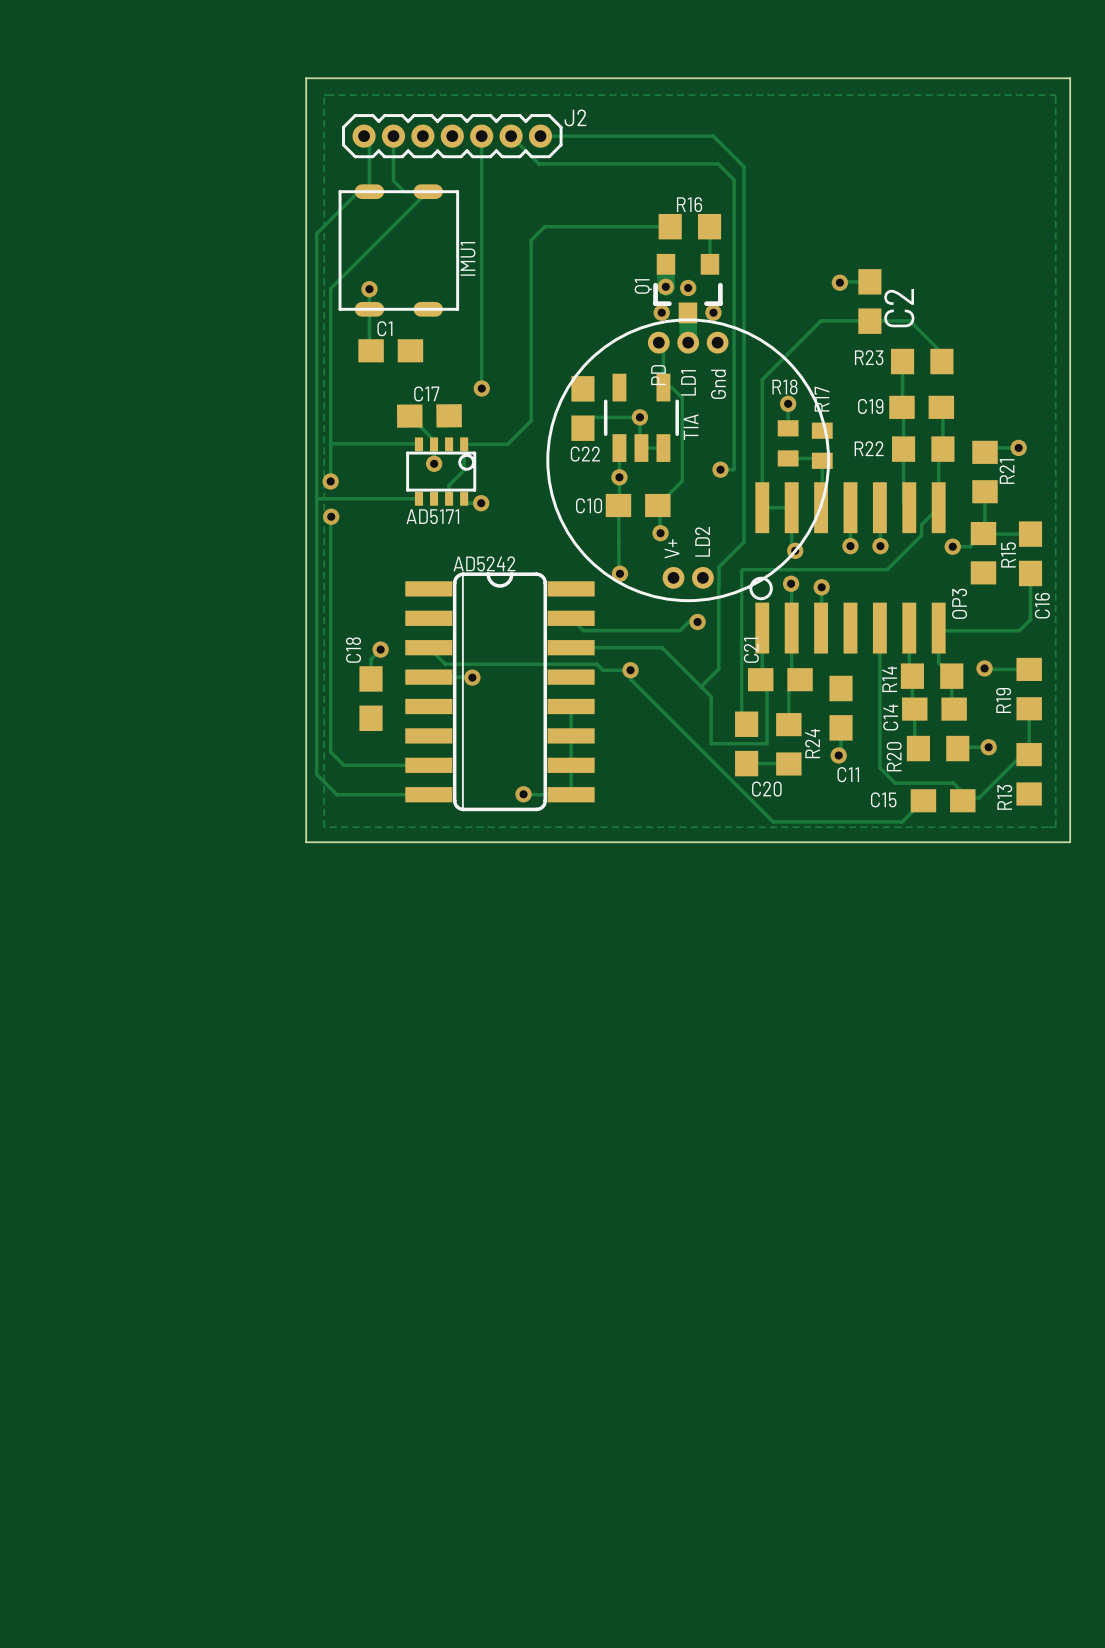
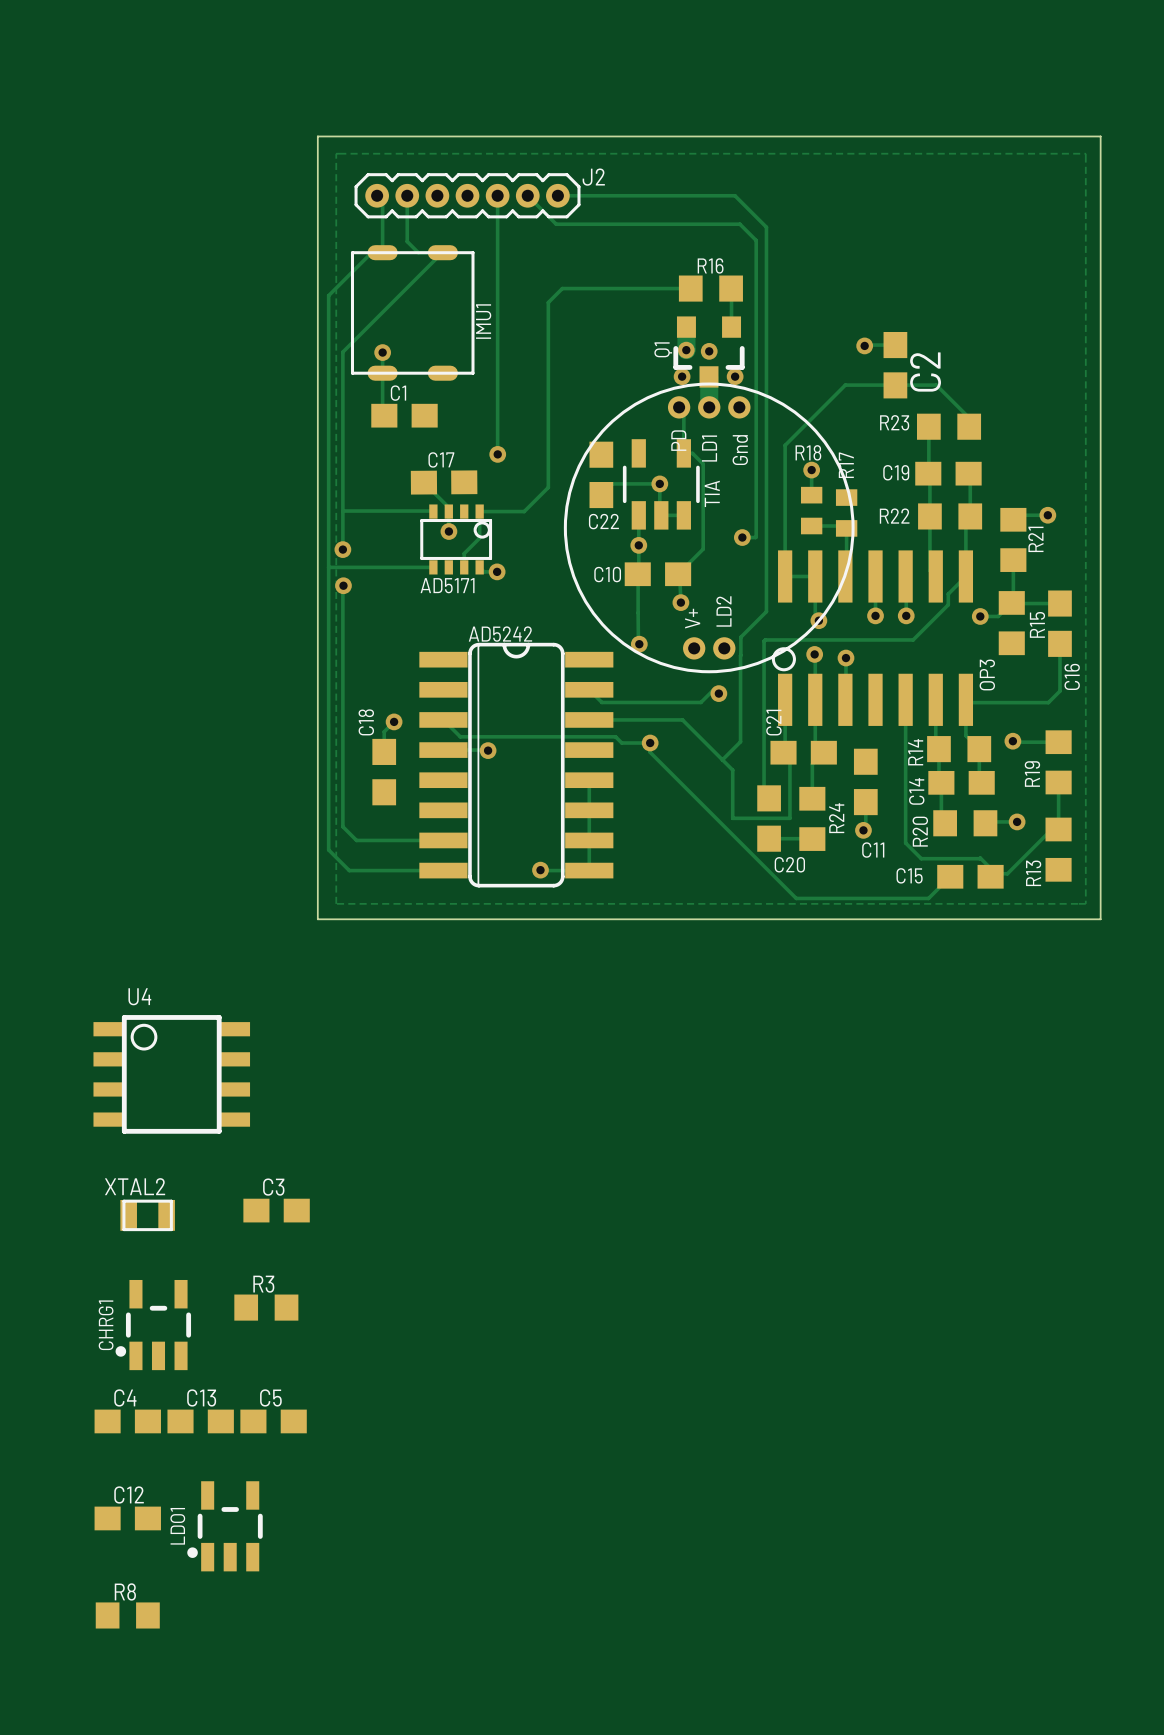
U4: none -> (171, 1074)
C3: none -> (276, 1210)
XTAL2: none -> (147, 1215)
R3: none -> (266, 1307)
CHRG1: none -> (153, 1325)
C4: none -> (127, 1421)
C13: none -> (200, 1421)
C5: none -> (273, 1421)
C12: none -> (127, 1518)
LDO1: none -> (225, 1526)
R8: none -> (127, 1615)

